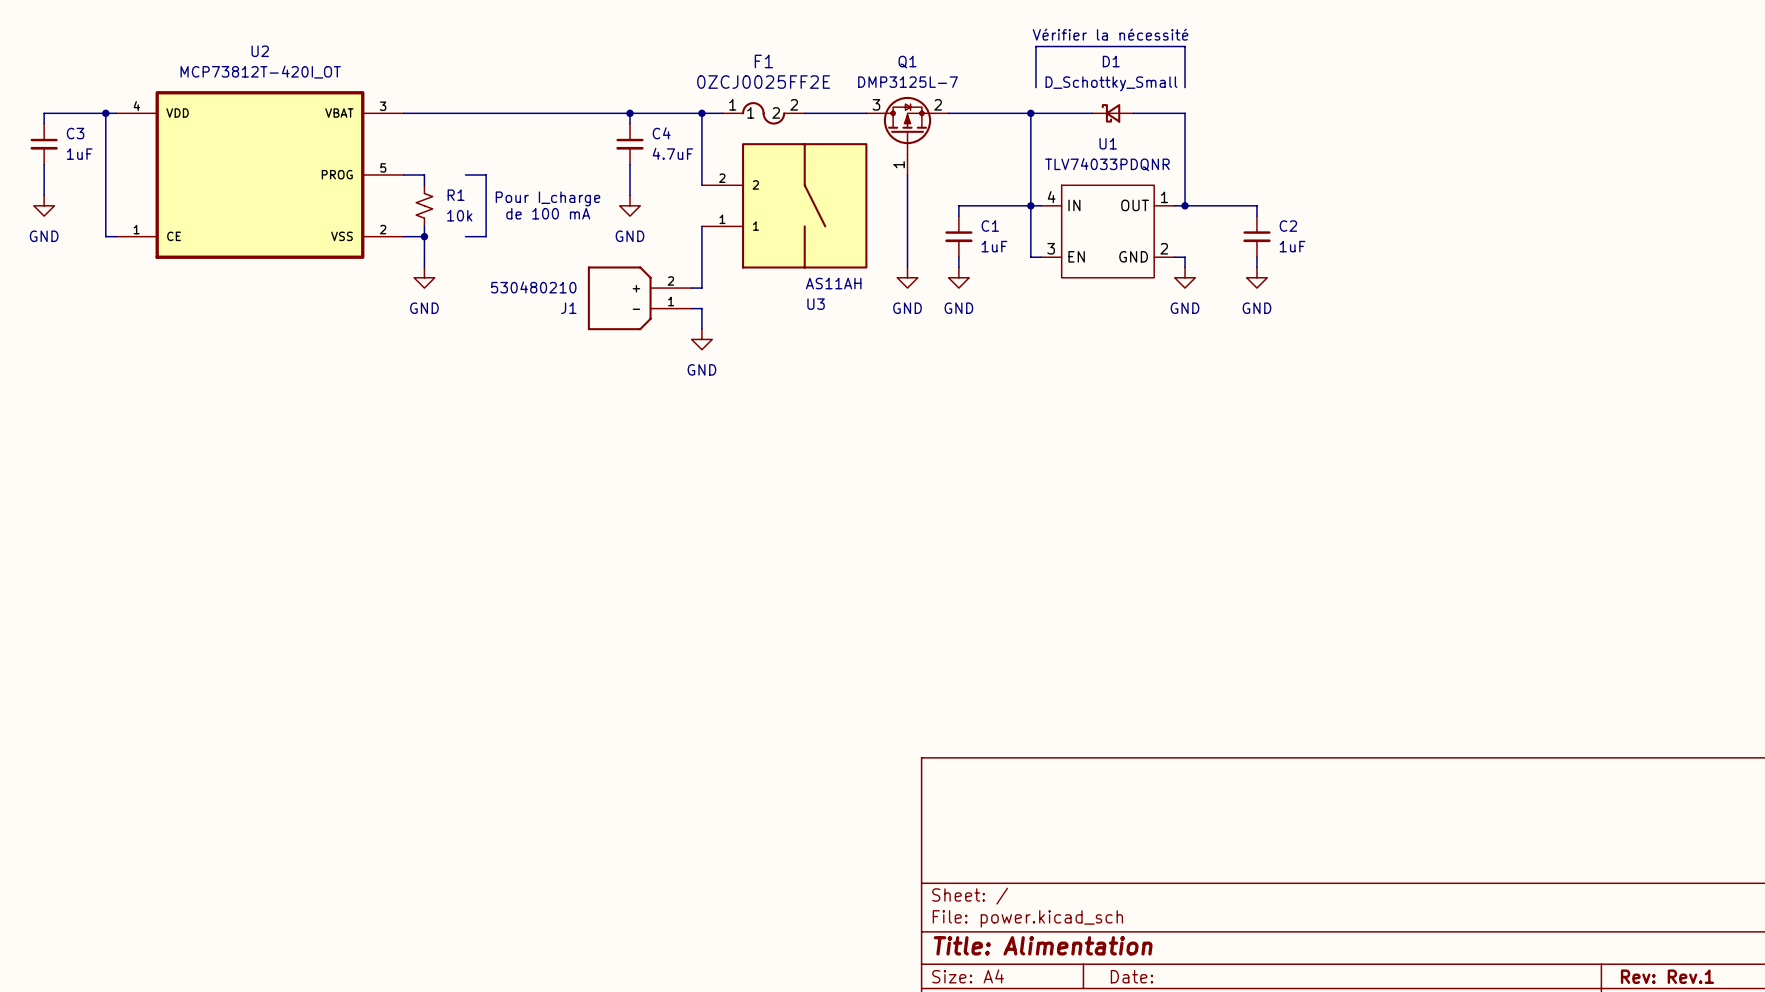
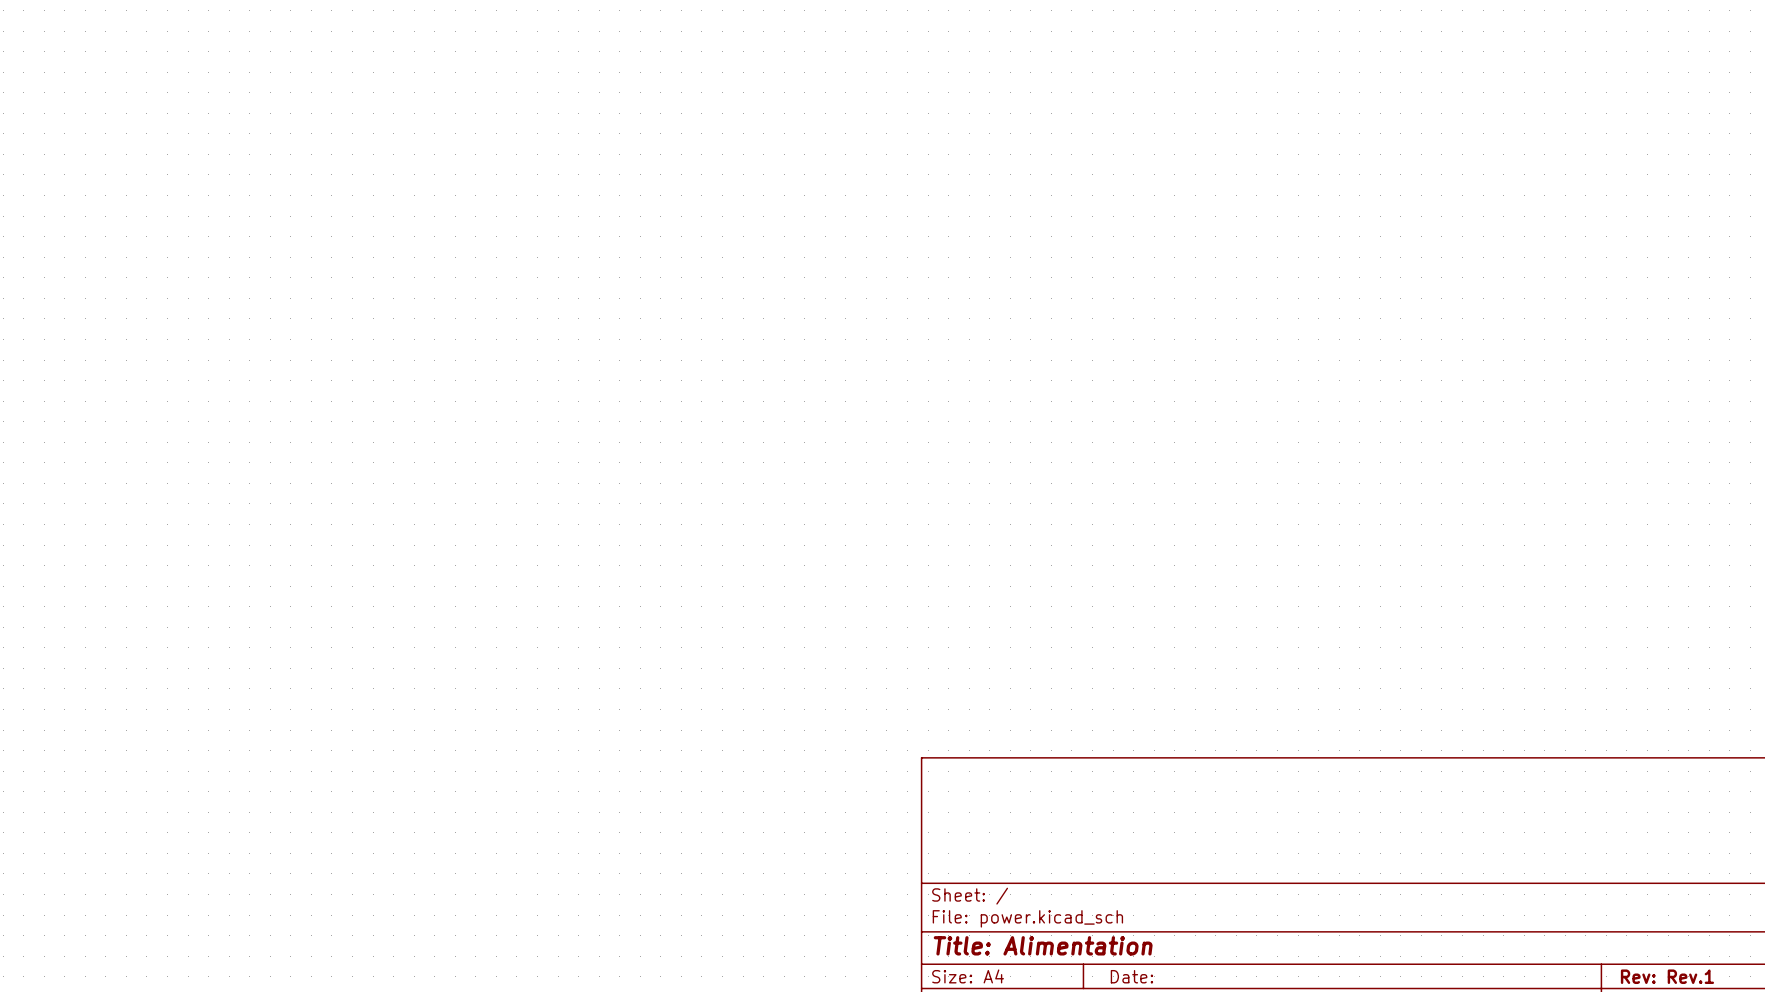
text: Vérifier la nécessité (1110, 34) -> none
line: (1035, 87) (1035, 46) (1185, 46) (1185, 87) -> none
wire: (105, 113) (105, 236) (116, 236) -> none
junction: (105, 113) -> none
wire: (116, 113) (44, 113) (44, 123) -> none
wire: (403, 113) (722, 113) -> none
wire: (629, 113) (629, 123) -> none
junction: (629, 113) -> none
wire: (701, 113) (701, 185) -> none
junction: (701, 113) -> none
F1: 0ZCJ0025FF2E (763, 113) -> none
wire: (804, 113) (866, 113) -> none
wire: (948, 113) (1092, 113) -> none
wire: (1030, 113) (1030, 257) (1041, 257) -> none
junction: (1030, 113) -> none
D1: D_Schottky_Small (1113, 113) -> none
wire: (1133, 113) (1185, 113) (1185, 205) -> none
Q1: DMP3125L-7 (907, 135) -> none
C3: 1uF (44, 144) -> none
C4: 4.7uF (629, 144) -> none
wire: (44, 164) (44, 195) -> none
wire: (629, 164) (629, 195) -> none
U2: MCP73812T-420I_OT (259, 174) -> none
wire: (403, 174) (424, 174) (424, 185) -> none
line: (465, 174) (486, 174) (486, 236) (465, 236) -> none
wire: (907, 174) (907, 267) -> none
text: Pour I_charge (548, 198) -> none
power symbol: GND (44, 205) -> none
R1: 10k (424, 205) -> none
power symbol: GND (629, 205) -> none
U3: AS11AH (784, 205) -> none
junction: (1030, 205) -> none
wire: (1041, 205) (958, 205) (958, 216) -> none
wire: (1174, 205) (1256, 205) (1256, 216) -> none
junction: (1185, 205) -> none
text: de 100 mA (548, 213) -> none
wire: (424, 226) (424, 267) -> none
wire: (701, 226) (701, 288) (691, 288) -> none
U1: TLV74033PDQNR (1107, 231) -> none
wire: (403, 236) (424, 236) -> none
junction: (424, 236) -> none
C1: 1uF (958, 236) -> none
C2: 1uF (1256, 236) -> none
wire: (958, 257) (958, 267) -> none
wire: (1174, 257) (1185, 257) (1185, 267) -> none
wire: (1256, 257) (1256, 267) -> none
power symbol: GND (424, 277) -> none
power symbol: GND (907, 277) -> none
power symbol: GND (958, 277) -> none
power symbol: GND (1185, 277) -> none
power symbol: GND (1256, 277) -> none
J1: 530480210 (639, 298) -> none
wire: (691, 308) (701, 308) (701, 329) -> none
power symbol: GND (701, 339) -> none

